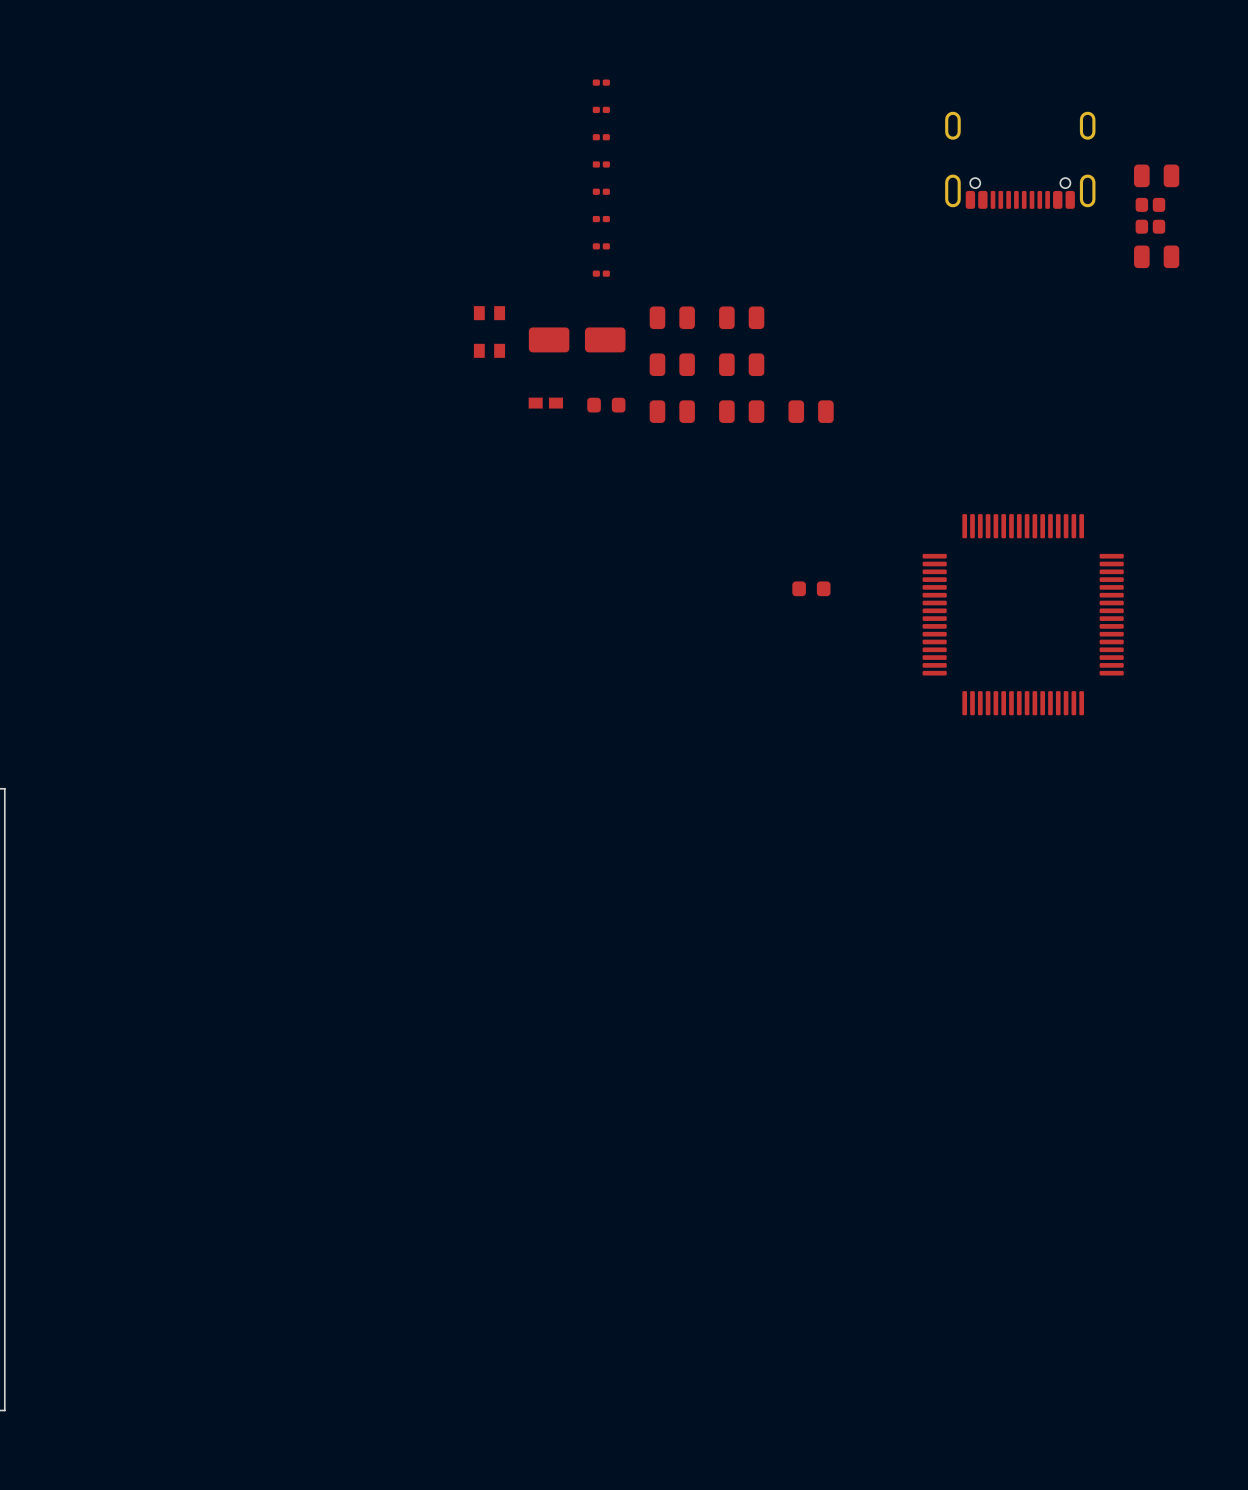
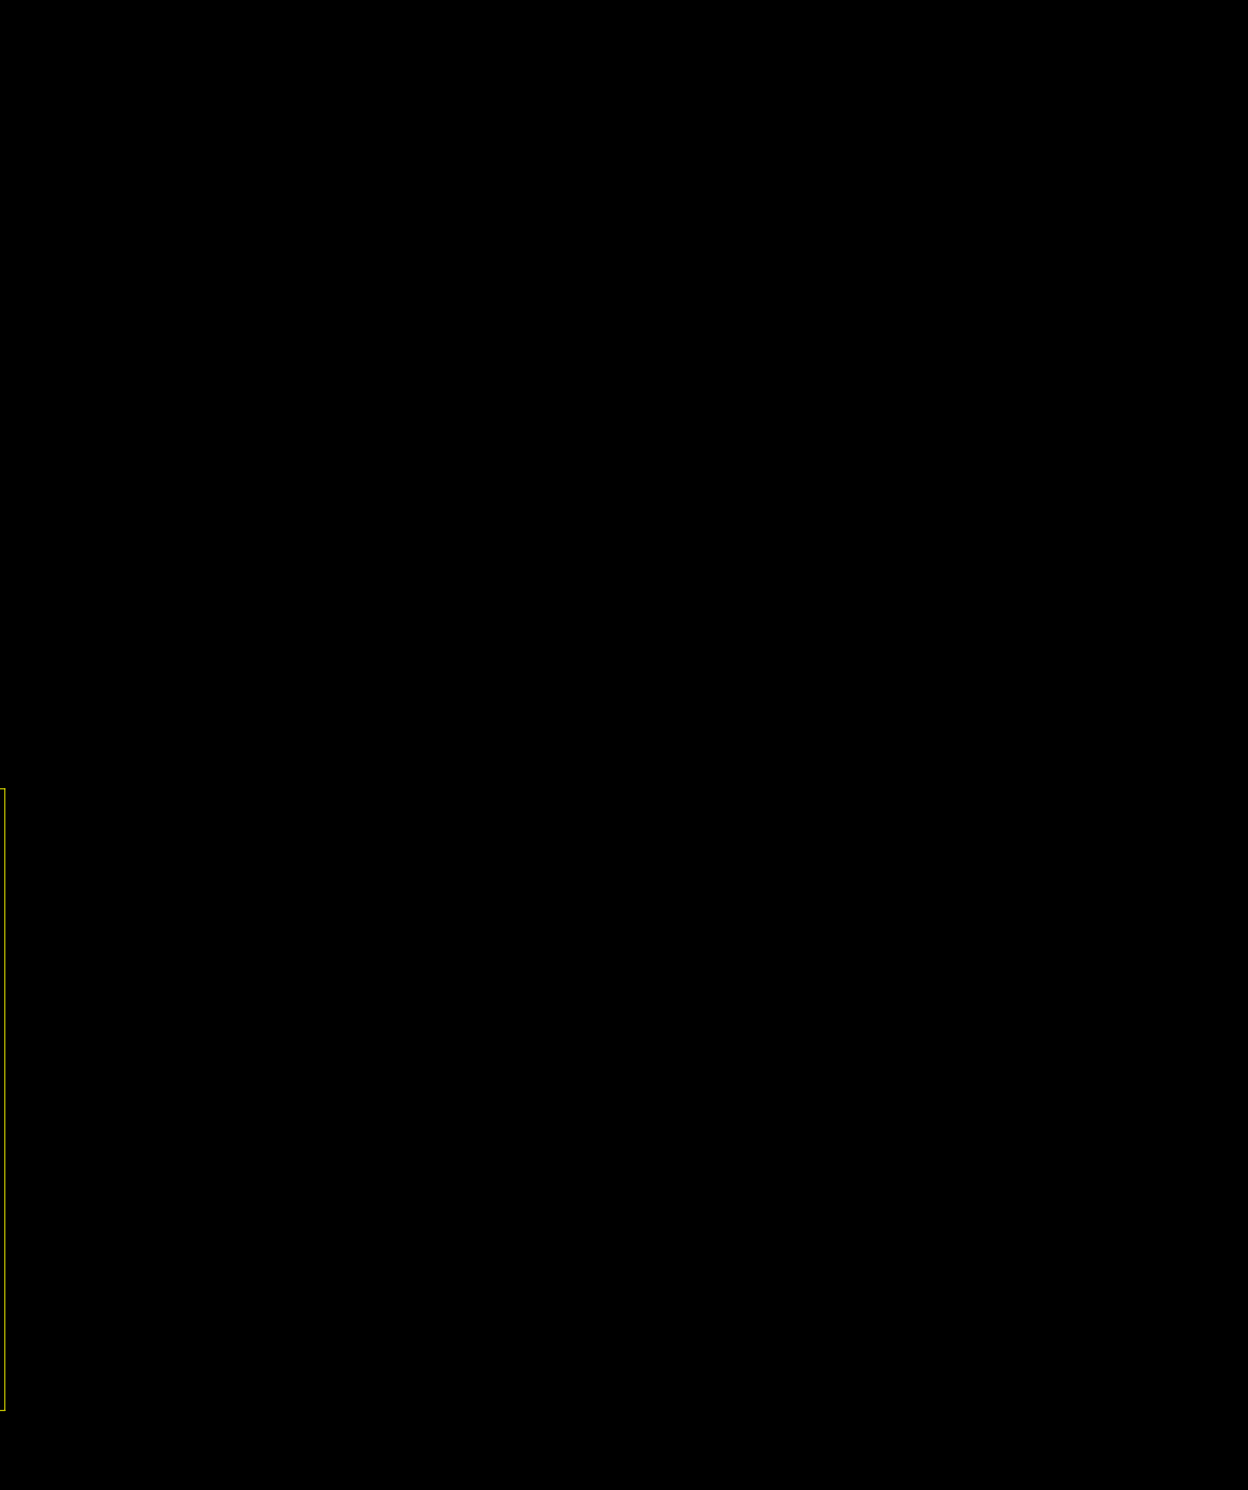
part: (601, 82) -> none
part: (601, 109) -> none
part: (601, 137) -> none
part: (1020, 160) -> none
part: (601, 164) -> none
part: (1156, 175) -> none
part: (601, 191) -> none
part: (1150, 215) -> none
part: (601, 219) -> none
part: (601, 246) -> none
part: (1156, 256) -> none
part: (601, 273) -> none
part: (489, 313) -> none
part: (672, 317) -> none
part: (741, 317) -> none
part: (577, 339) -> none
part: (489, 350) -> none
part: (672, 364) -> none
part: (741, 364) -> none
part: (545, 403) -> none
part: (606, 405) -> none
part: (672, 411) -> none
part: (741, 411) -> none
part: (811, 411) -> none
part: (811, 588) -> none
part: (1023, 614) -> none

